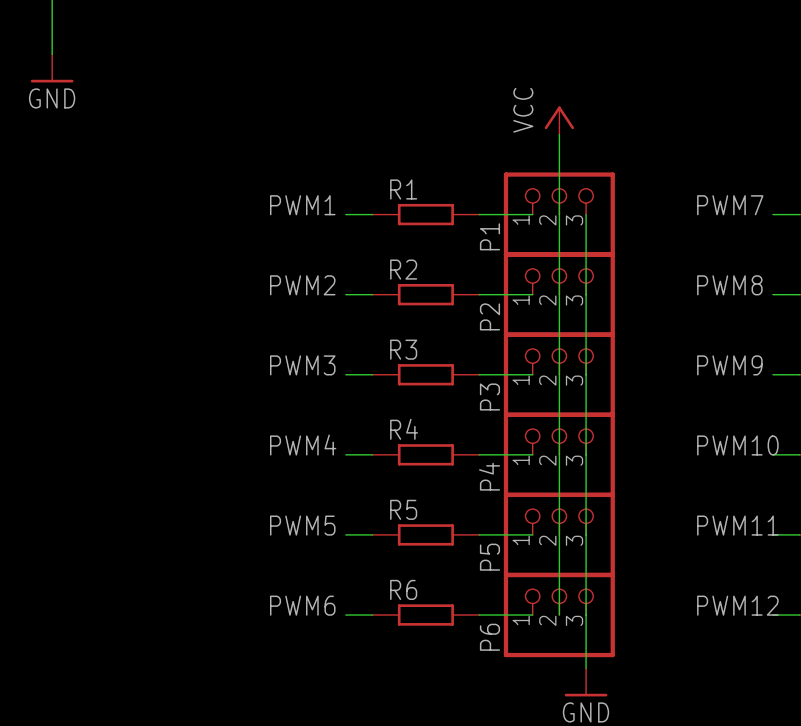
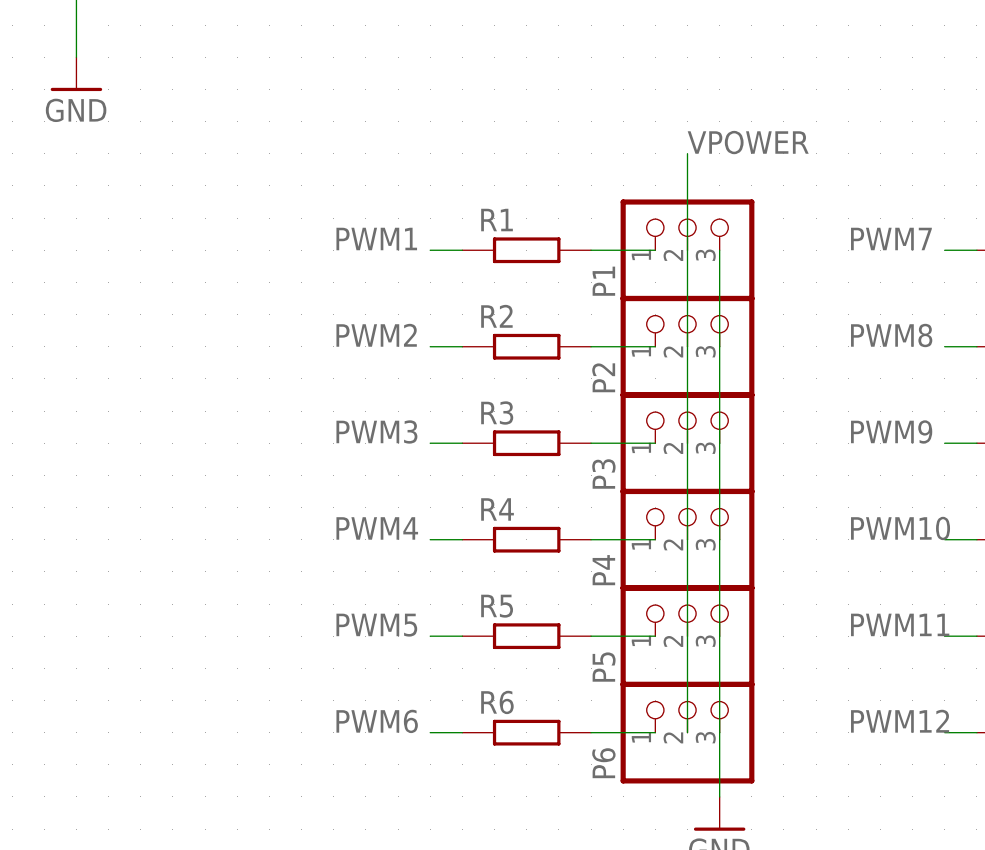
power symbol: VCC (559, 120) -> none
label: none -> VPOWER (748, 142)

